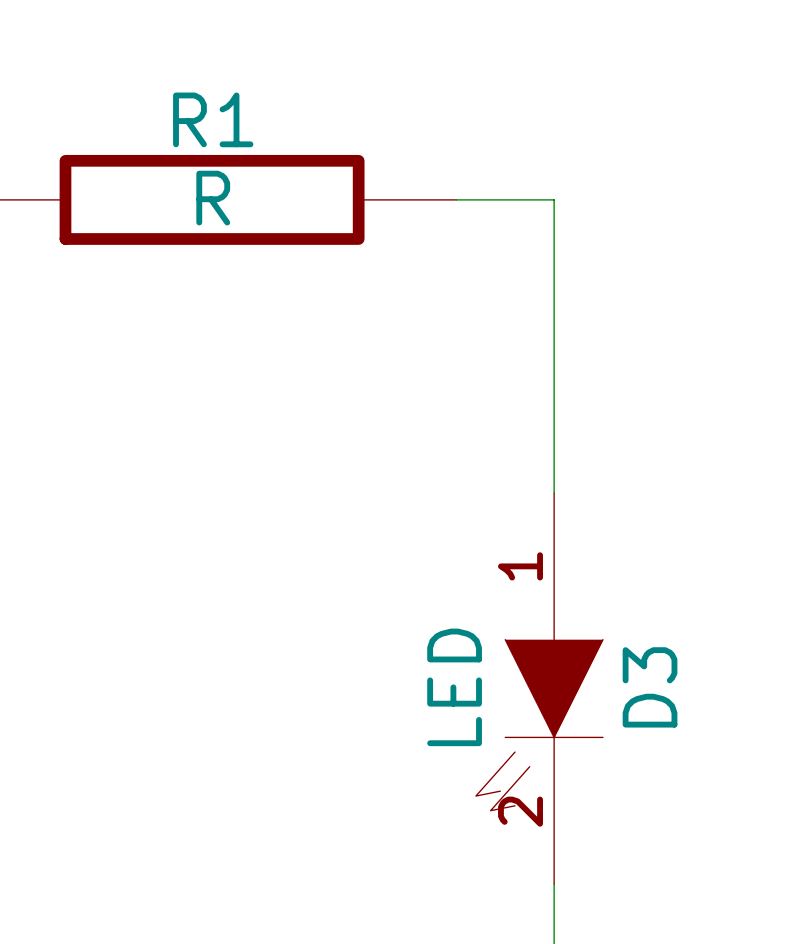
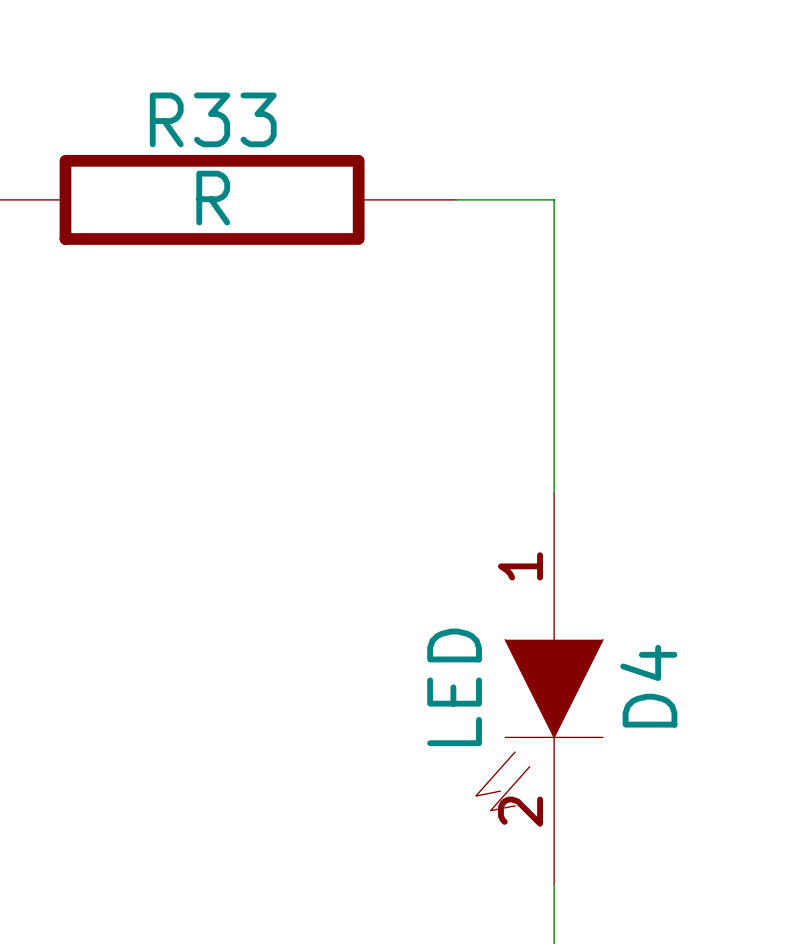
R1 name: R1 (213, 119) -> R33 (213, 119)
D3 name: D3 (650, 687) -> D4 (648, 686)

